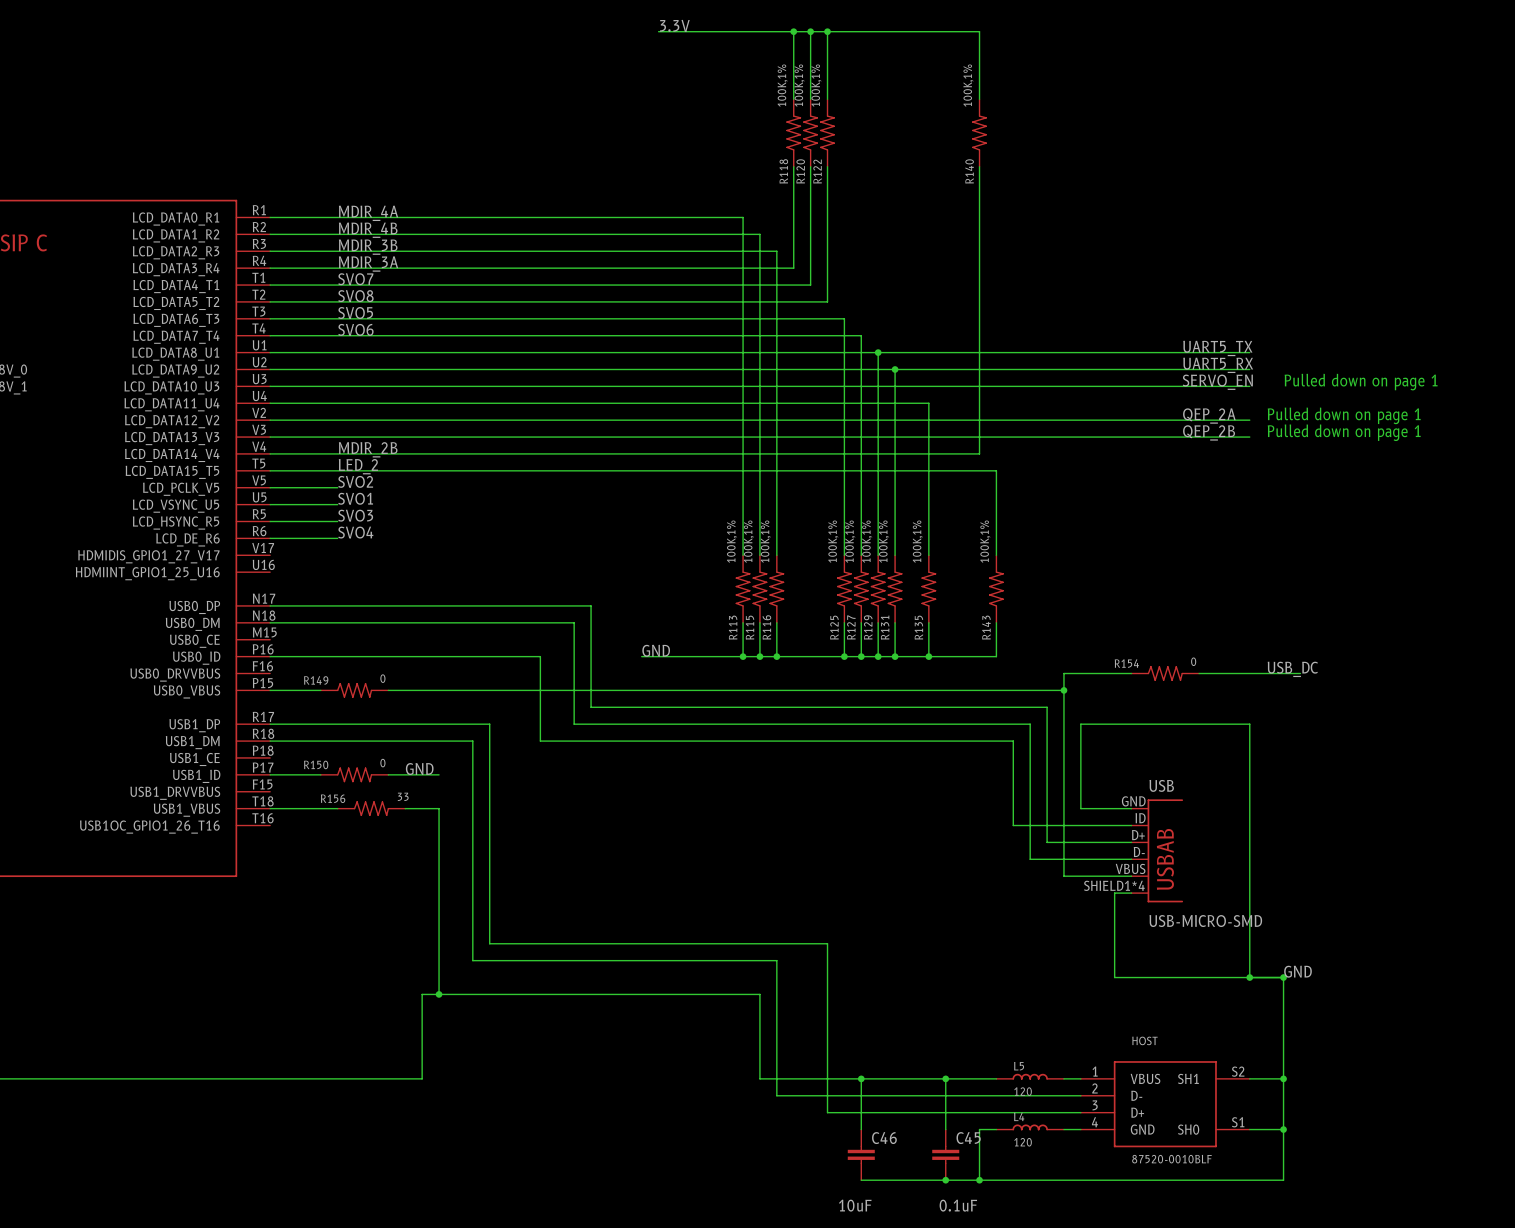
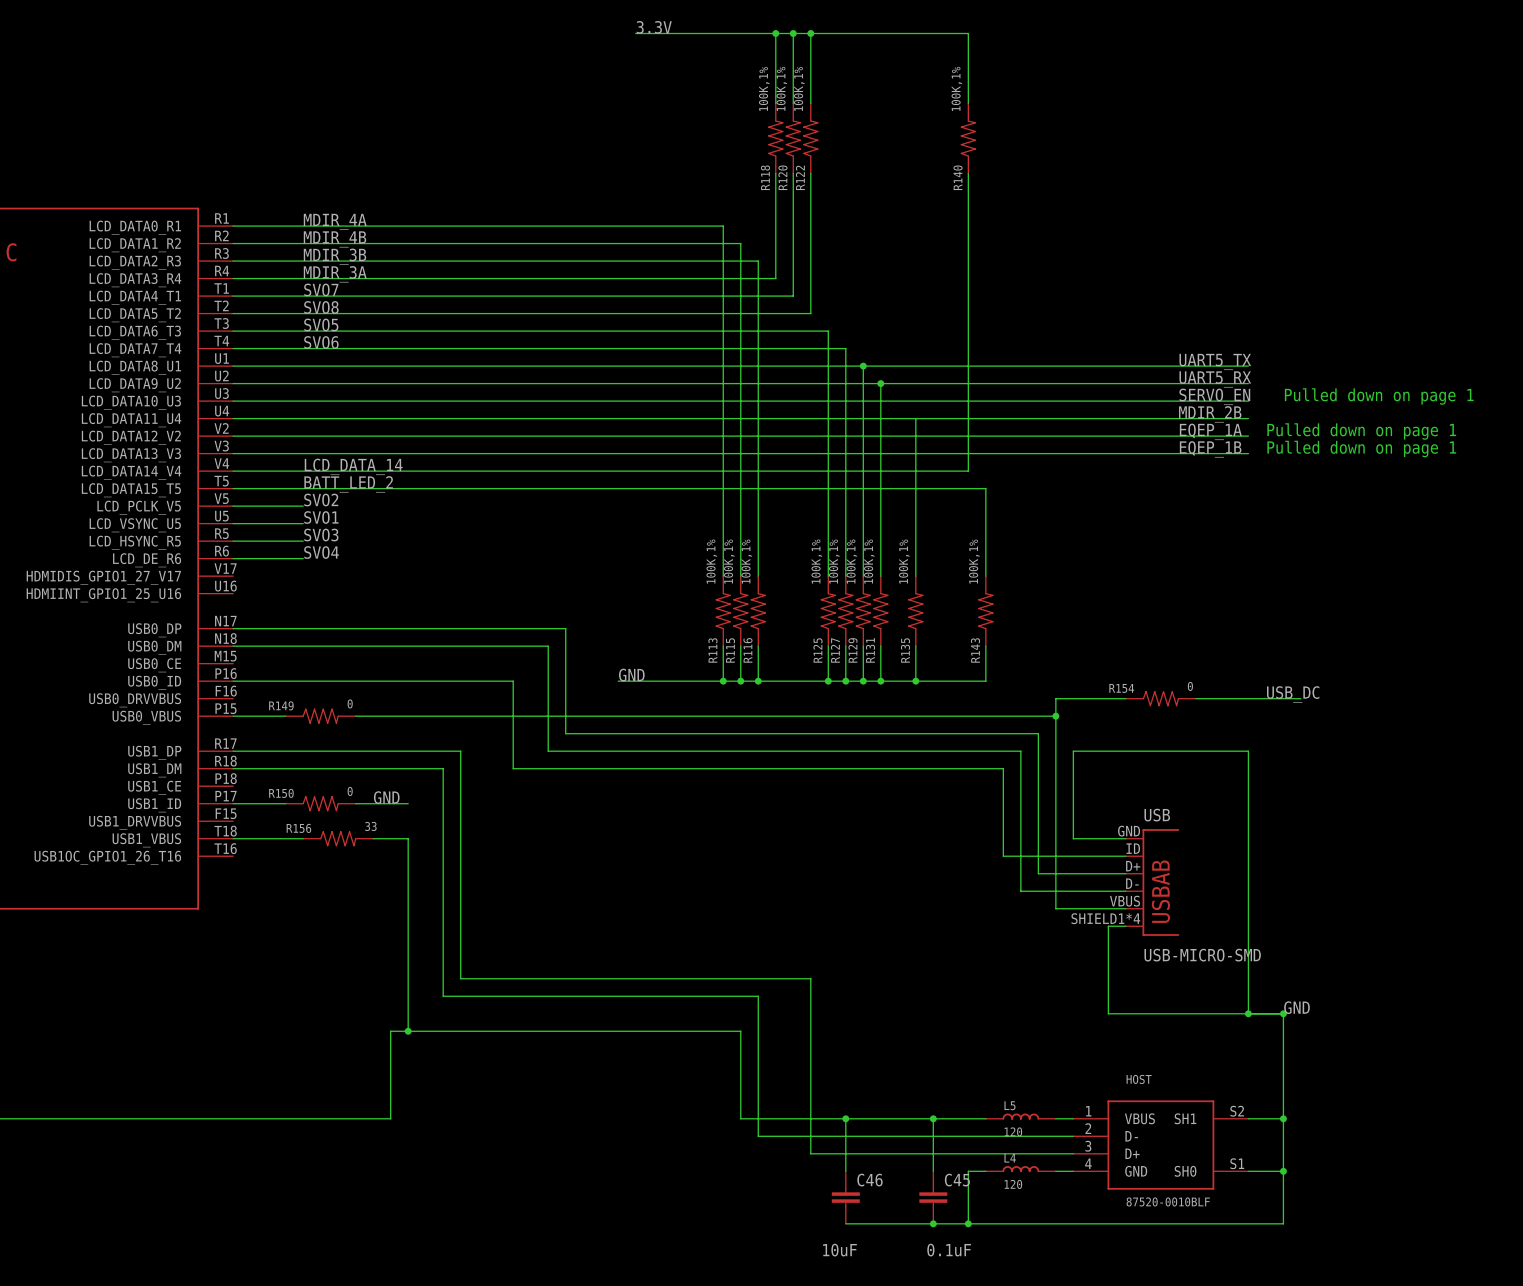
label: none -> MDIR_2B (1210, 414)
wire: none -> (915, 418) (1248, 418)
label: QEP_2A (1209, 416) -> EQEP_1A (1210, 431)
label: QEP_2B (1209, 432) -> EQEP_1B (1210, 449)
label: MDIR_2B (368, 449) -> LCD_DATA_14 (353, 466)
label: LED_2 (358, 466) -> BATT_LED_2 (348, 484)

